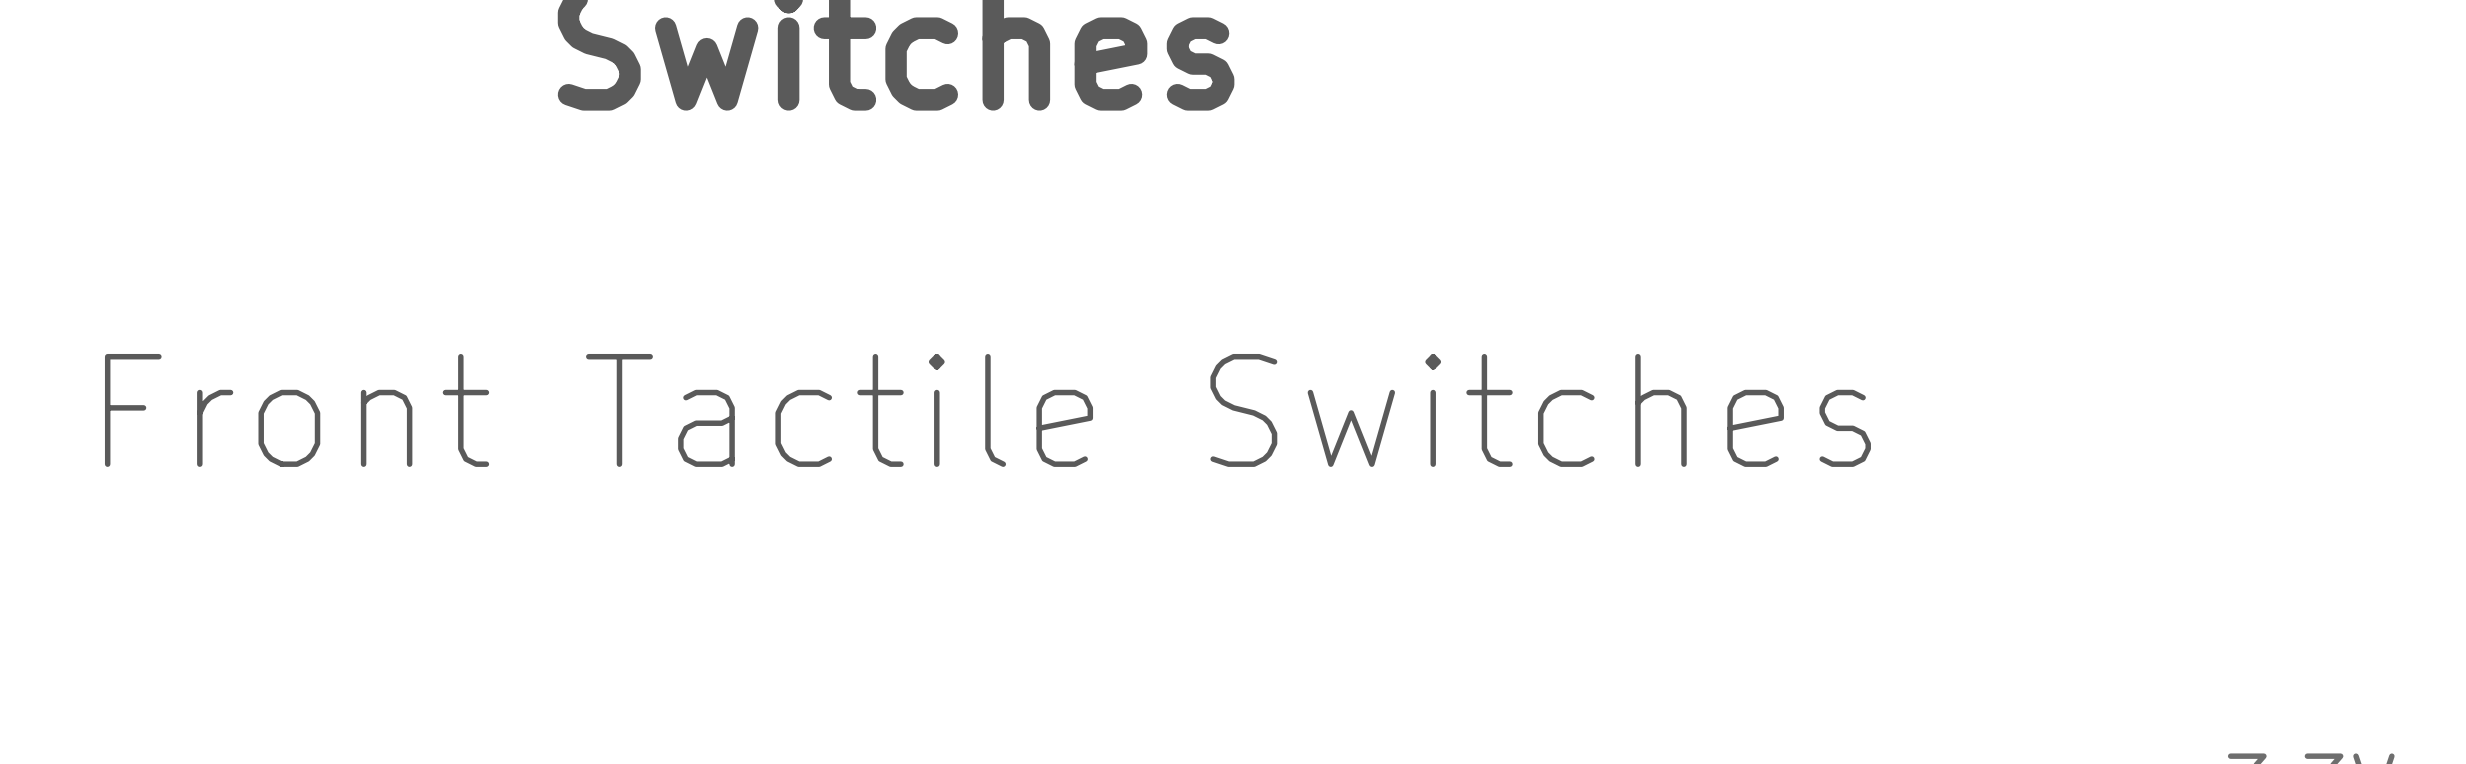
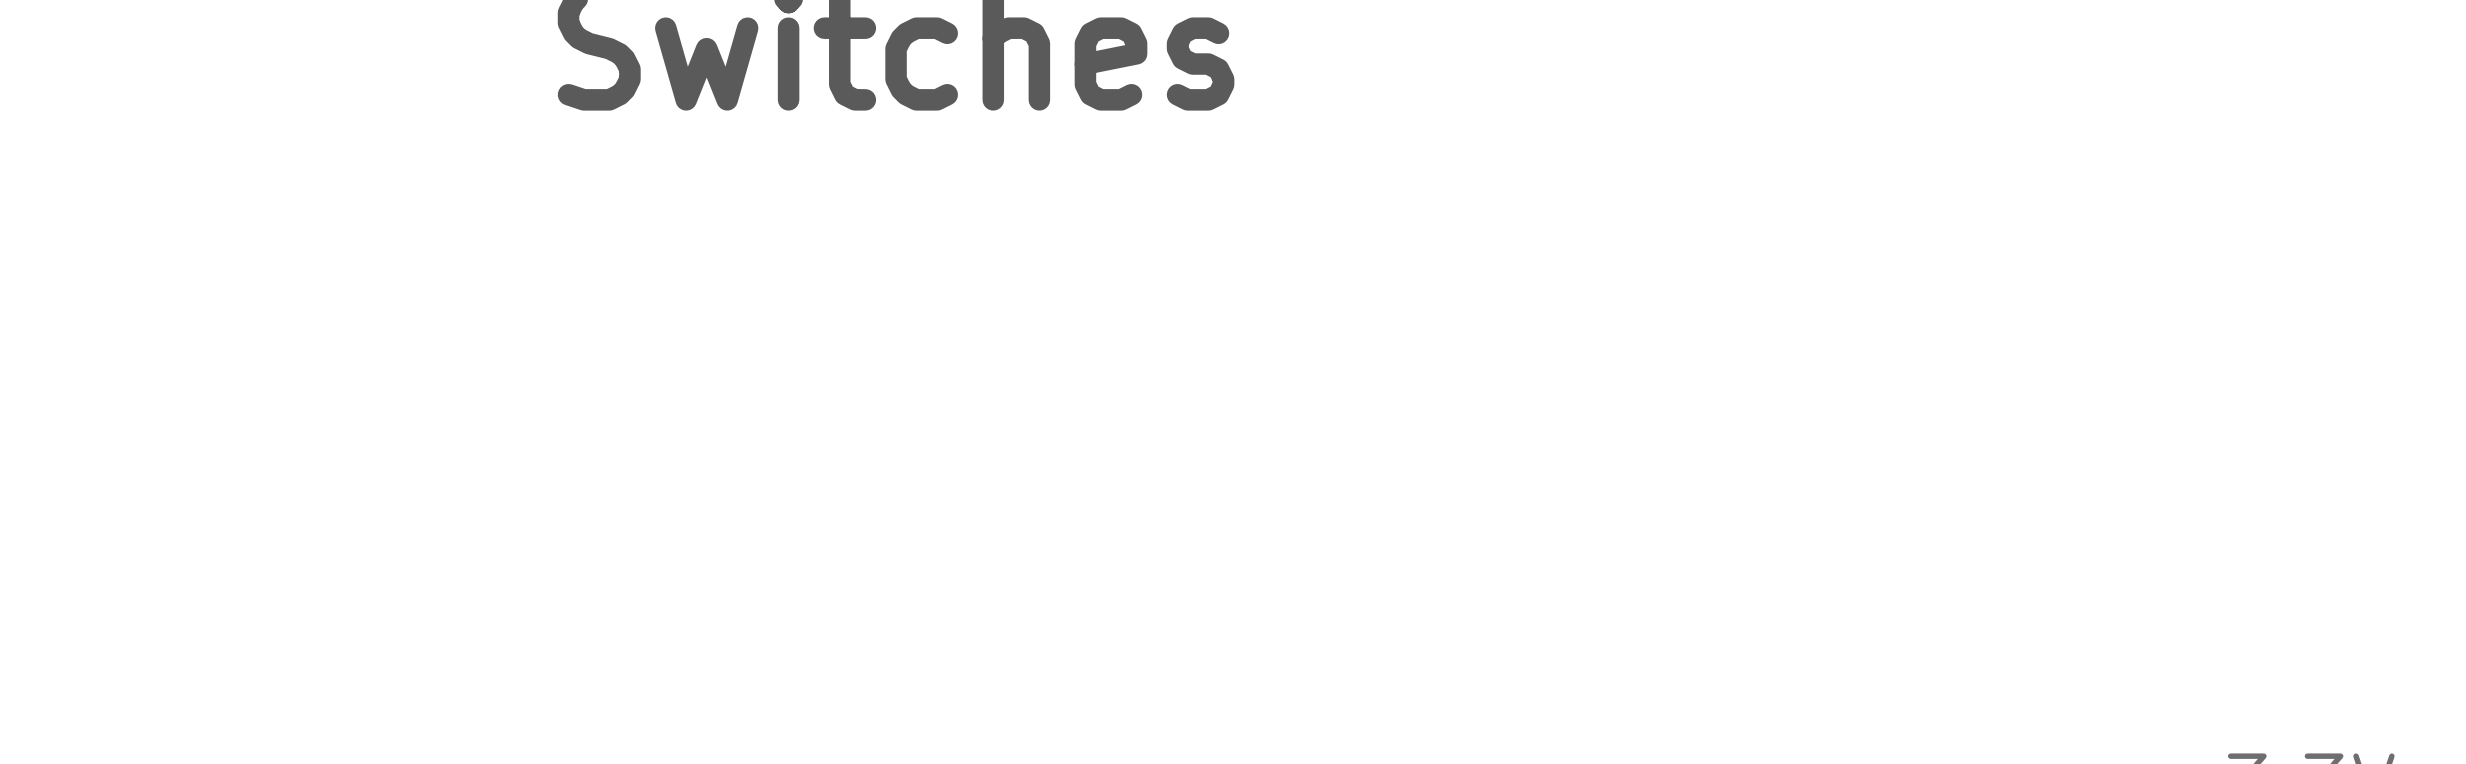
text: Front Tactile Switches (987, 410) -> none

